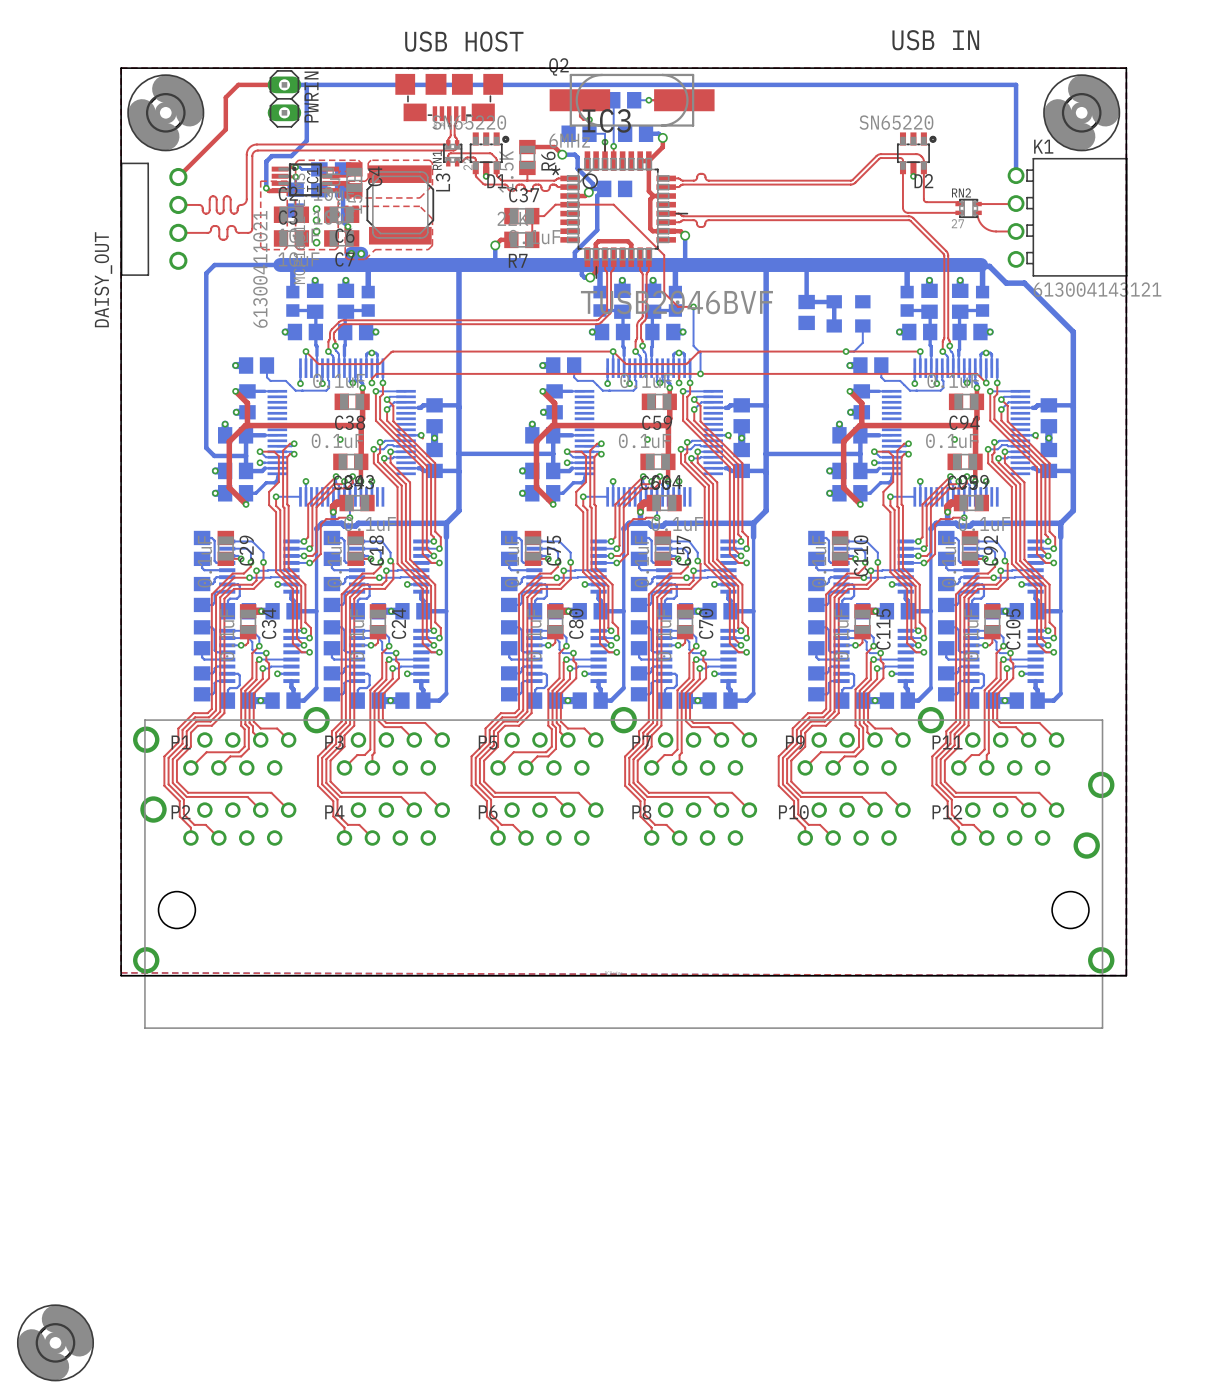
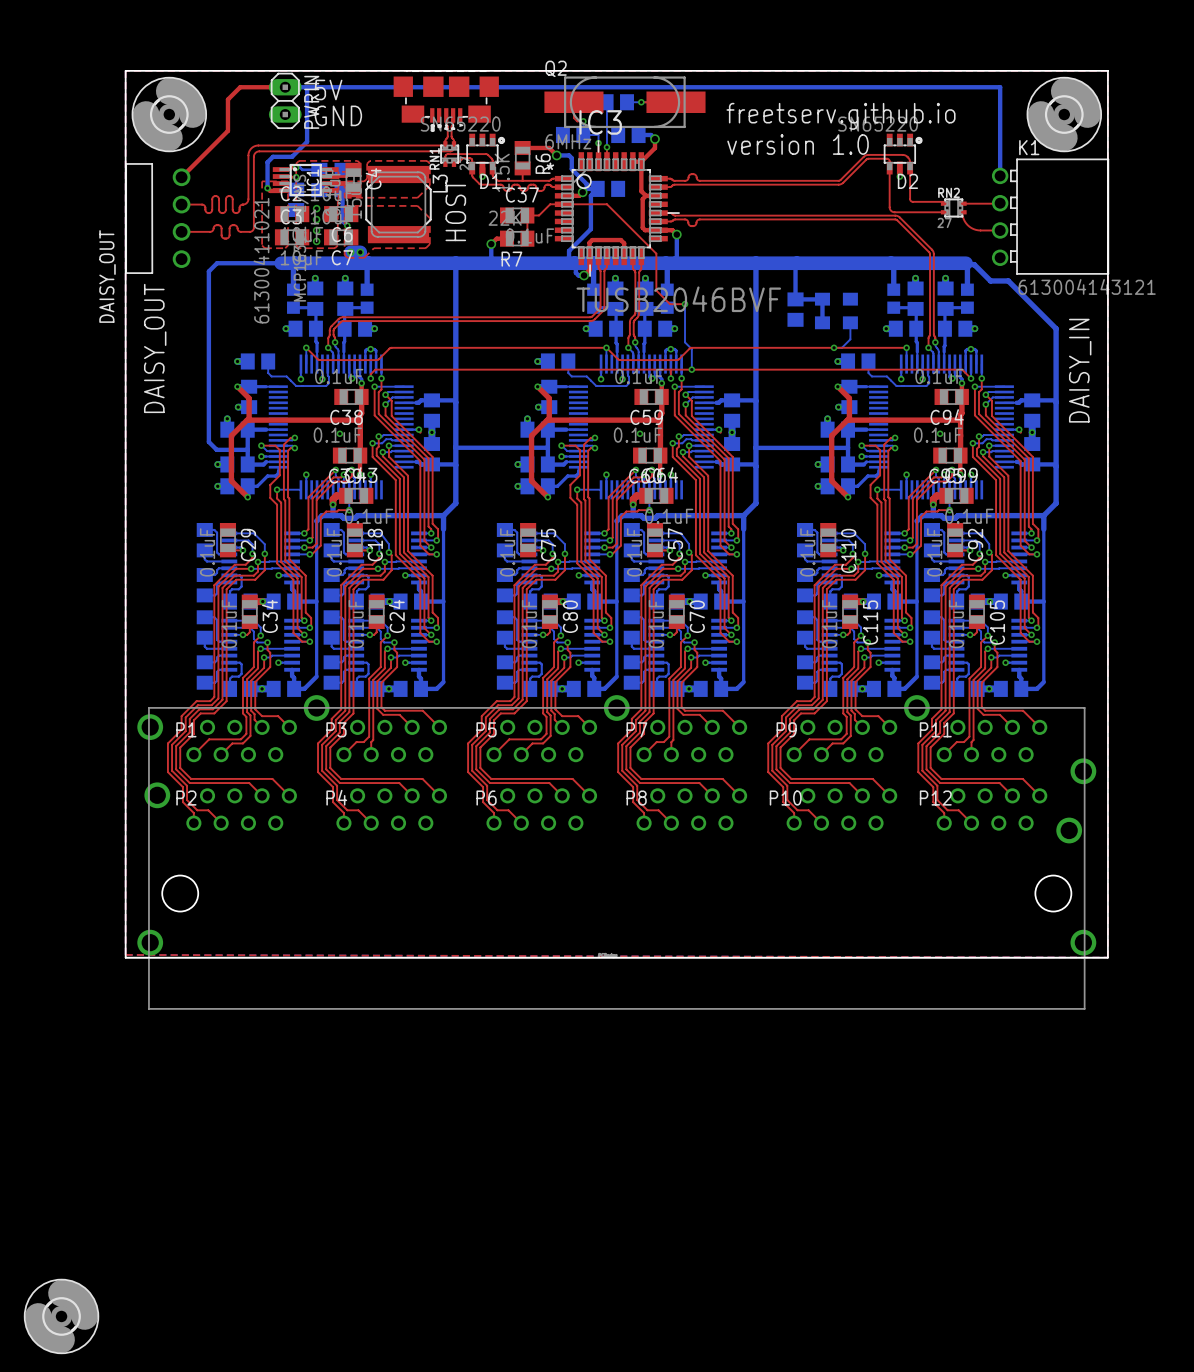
text: USB IN (935, 40) -> none
text: USB HOST (464, 41) -> none
text: none -> 5V (328, 89)
text: none -> freetserv.github.io (841, 116)
text: none -> GND (338, 115)
text: none -> version 1.0 (798, 144)
text: none -> HOST (455, 210)
text: none -> DAISY_OUT (155, 348)
text: none -> DAISY_IN (1080, 370)

